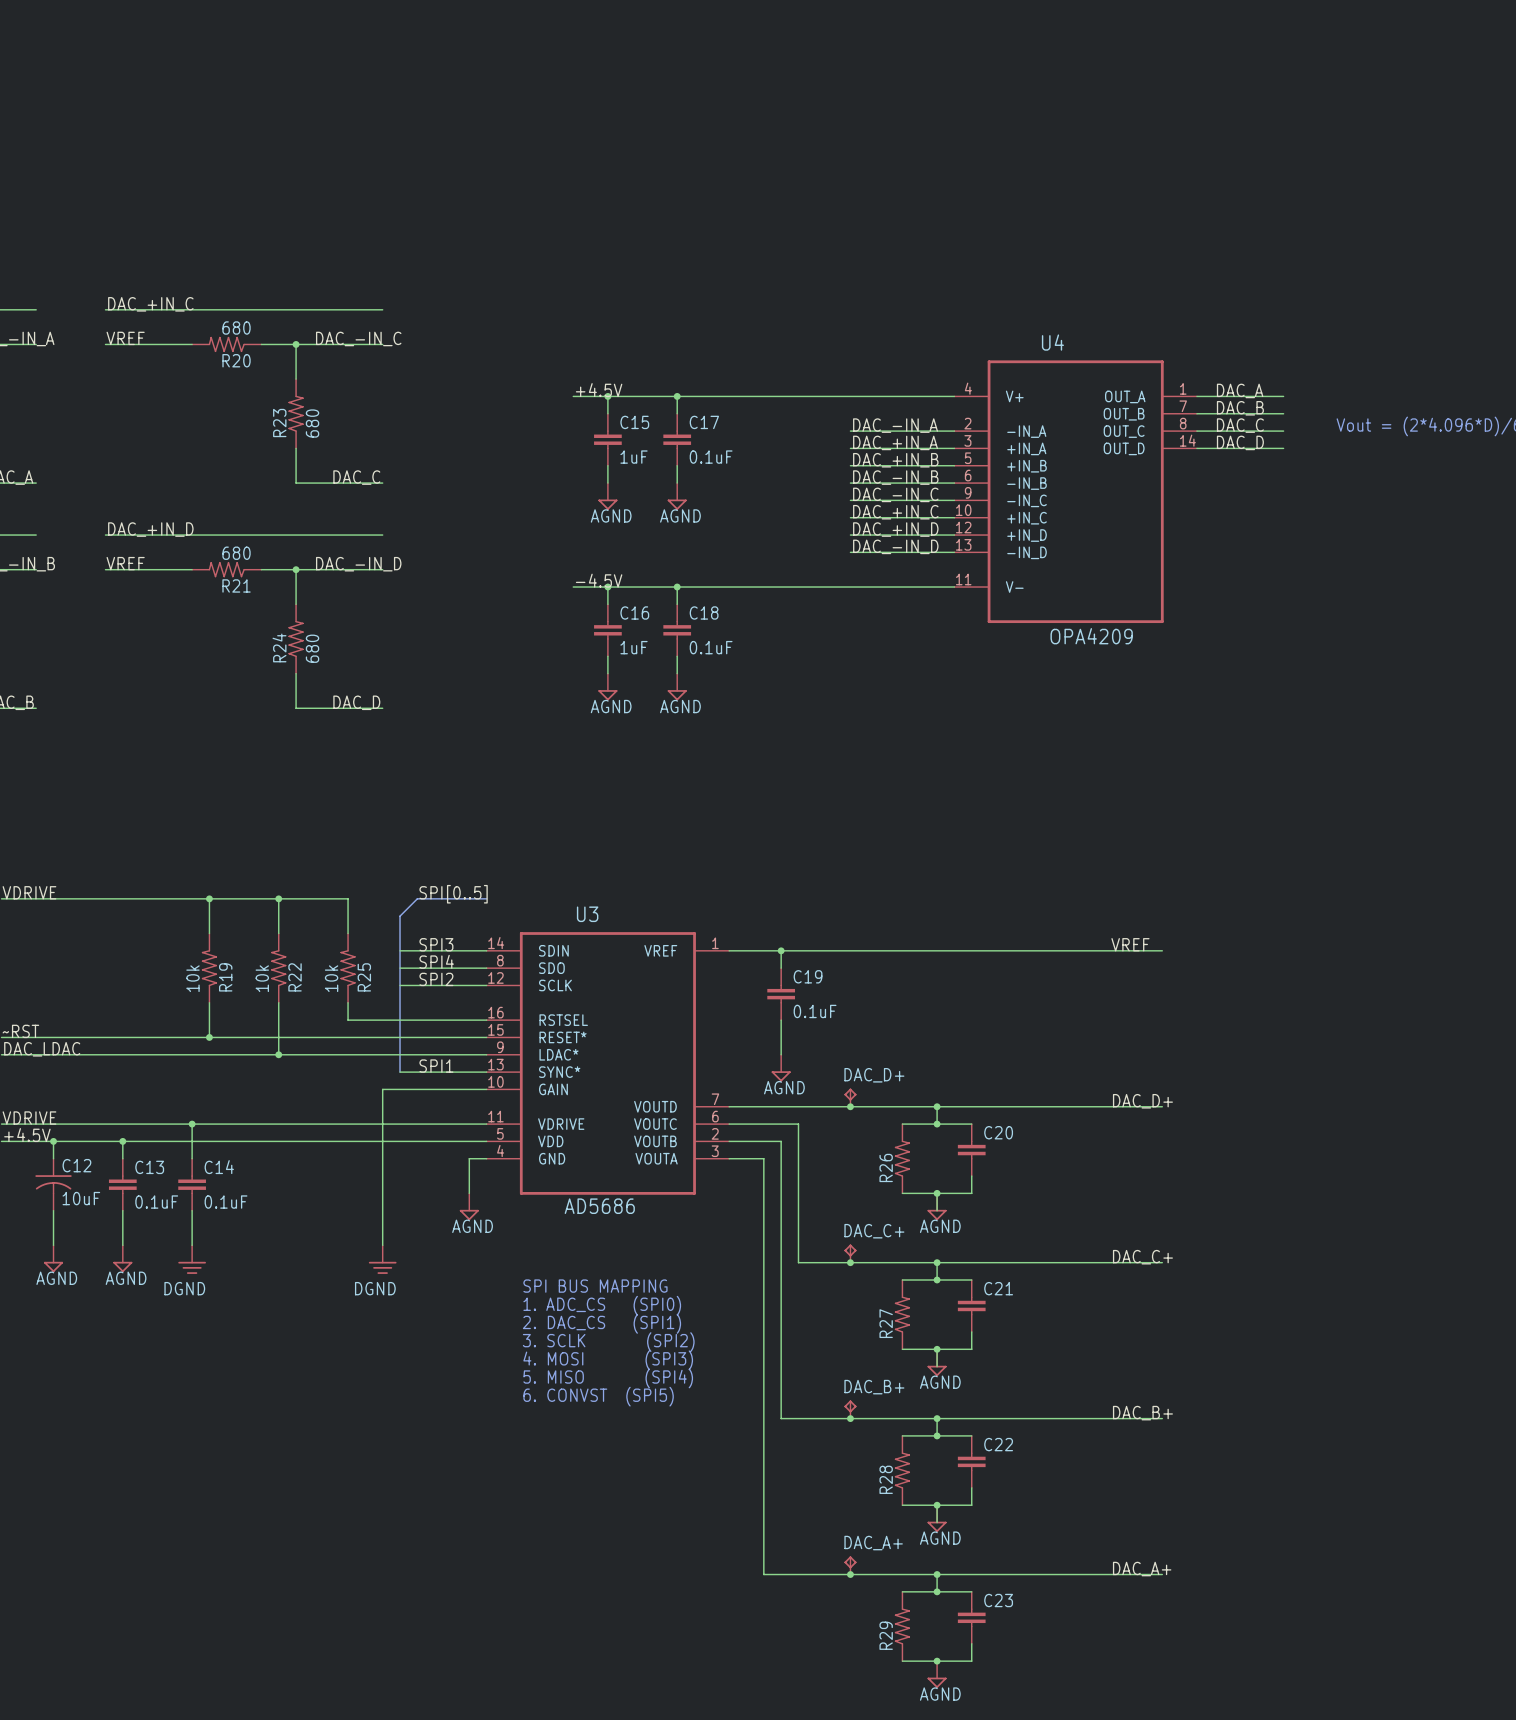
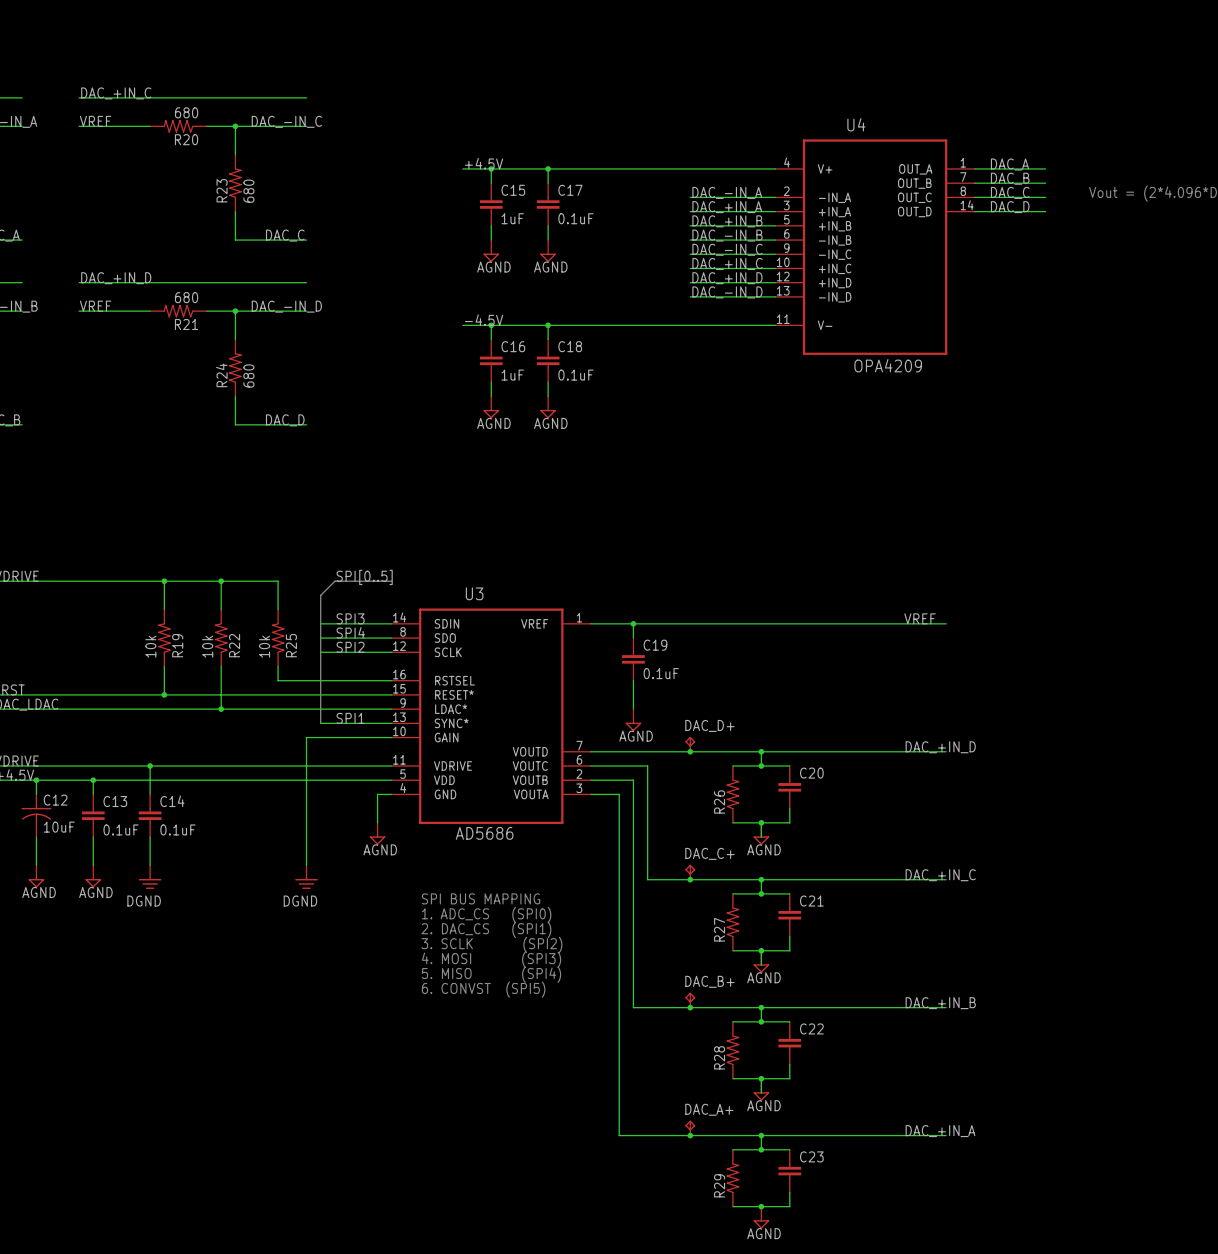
label: DAC_D+ (1142, 1101) -> DAC_+IN_D (940, 747)
label: DAC_C+ (1142, 1257) -> DAC_+IN_C (940, 875)
label: DAC_B+ (1142, 1413) -> DAC_+IN_B (940, 1003)
label: DAC_A+ (1142, 1569) -> DAC_+IN_A (940, 1131)

